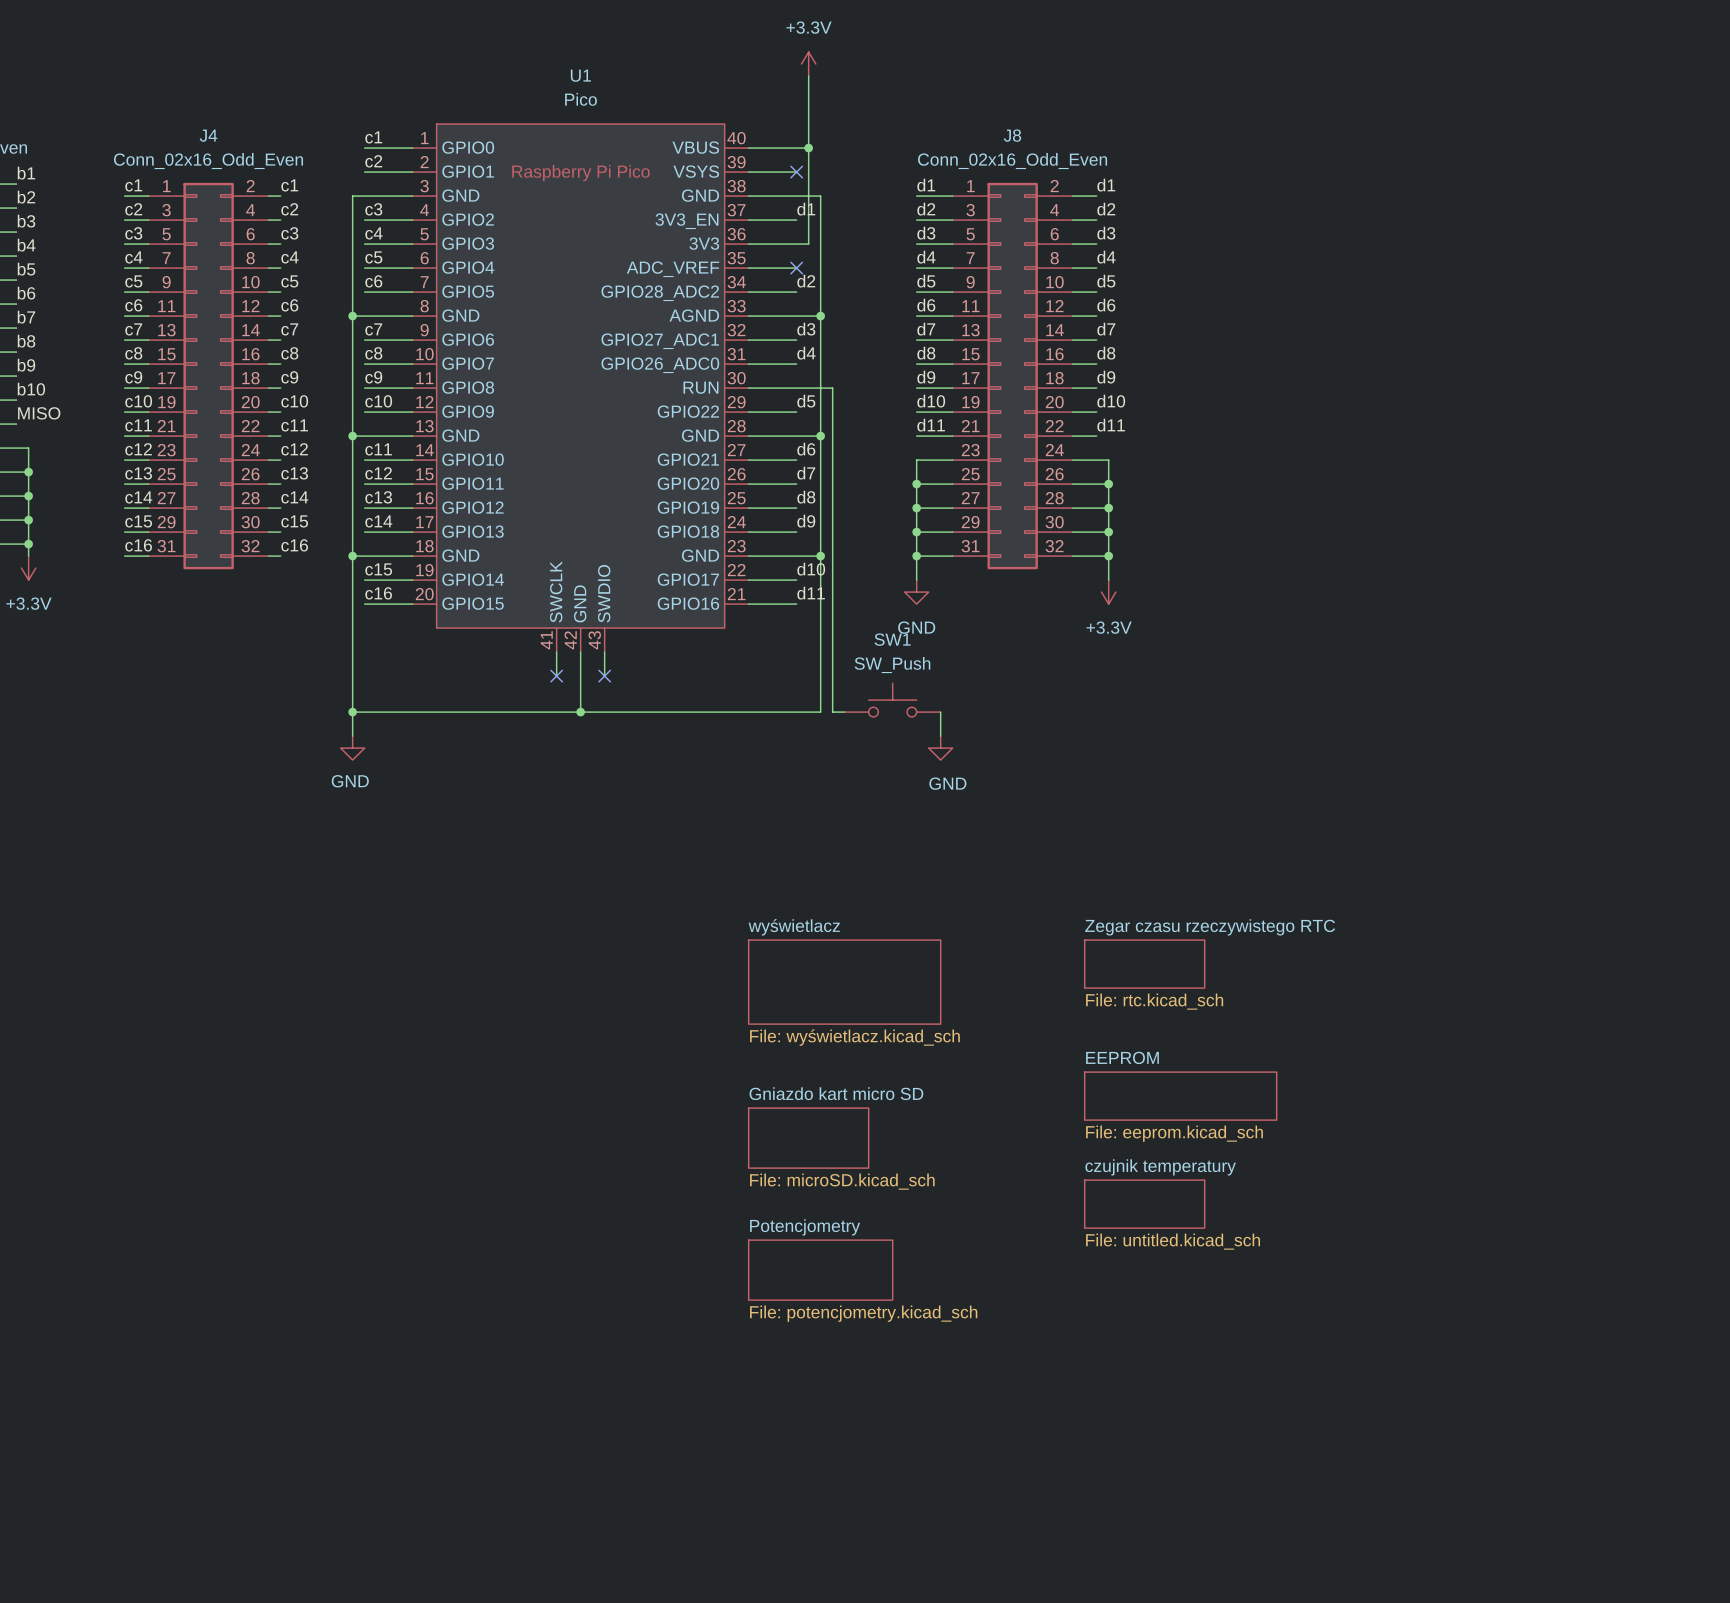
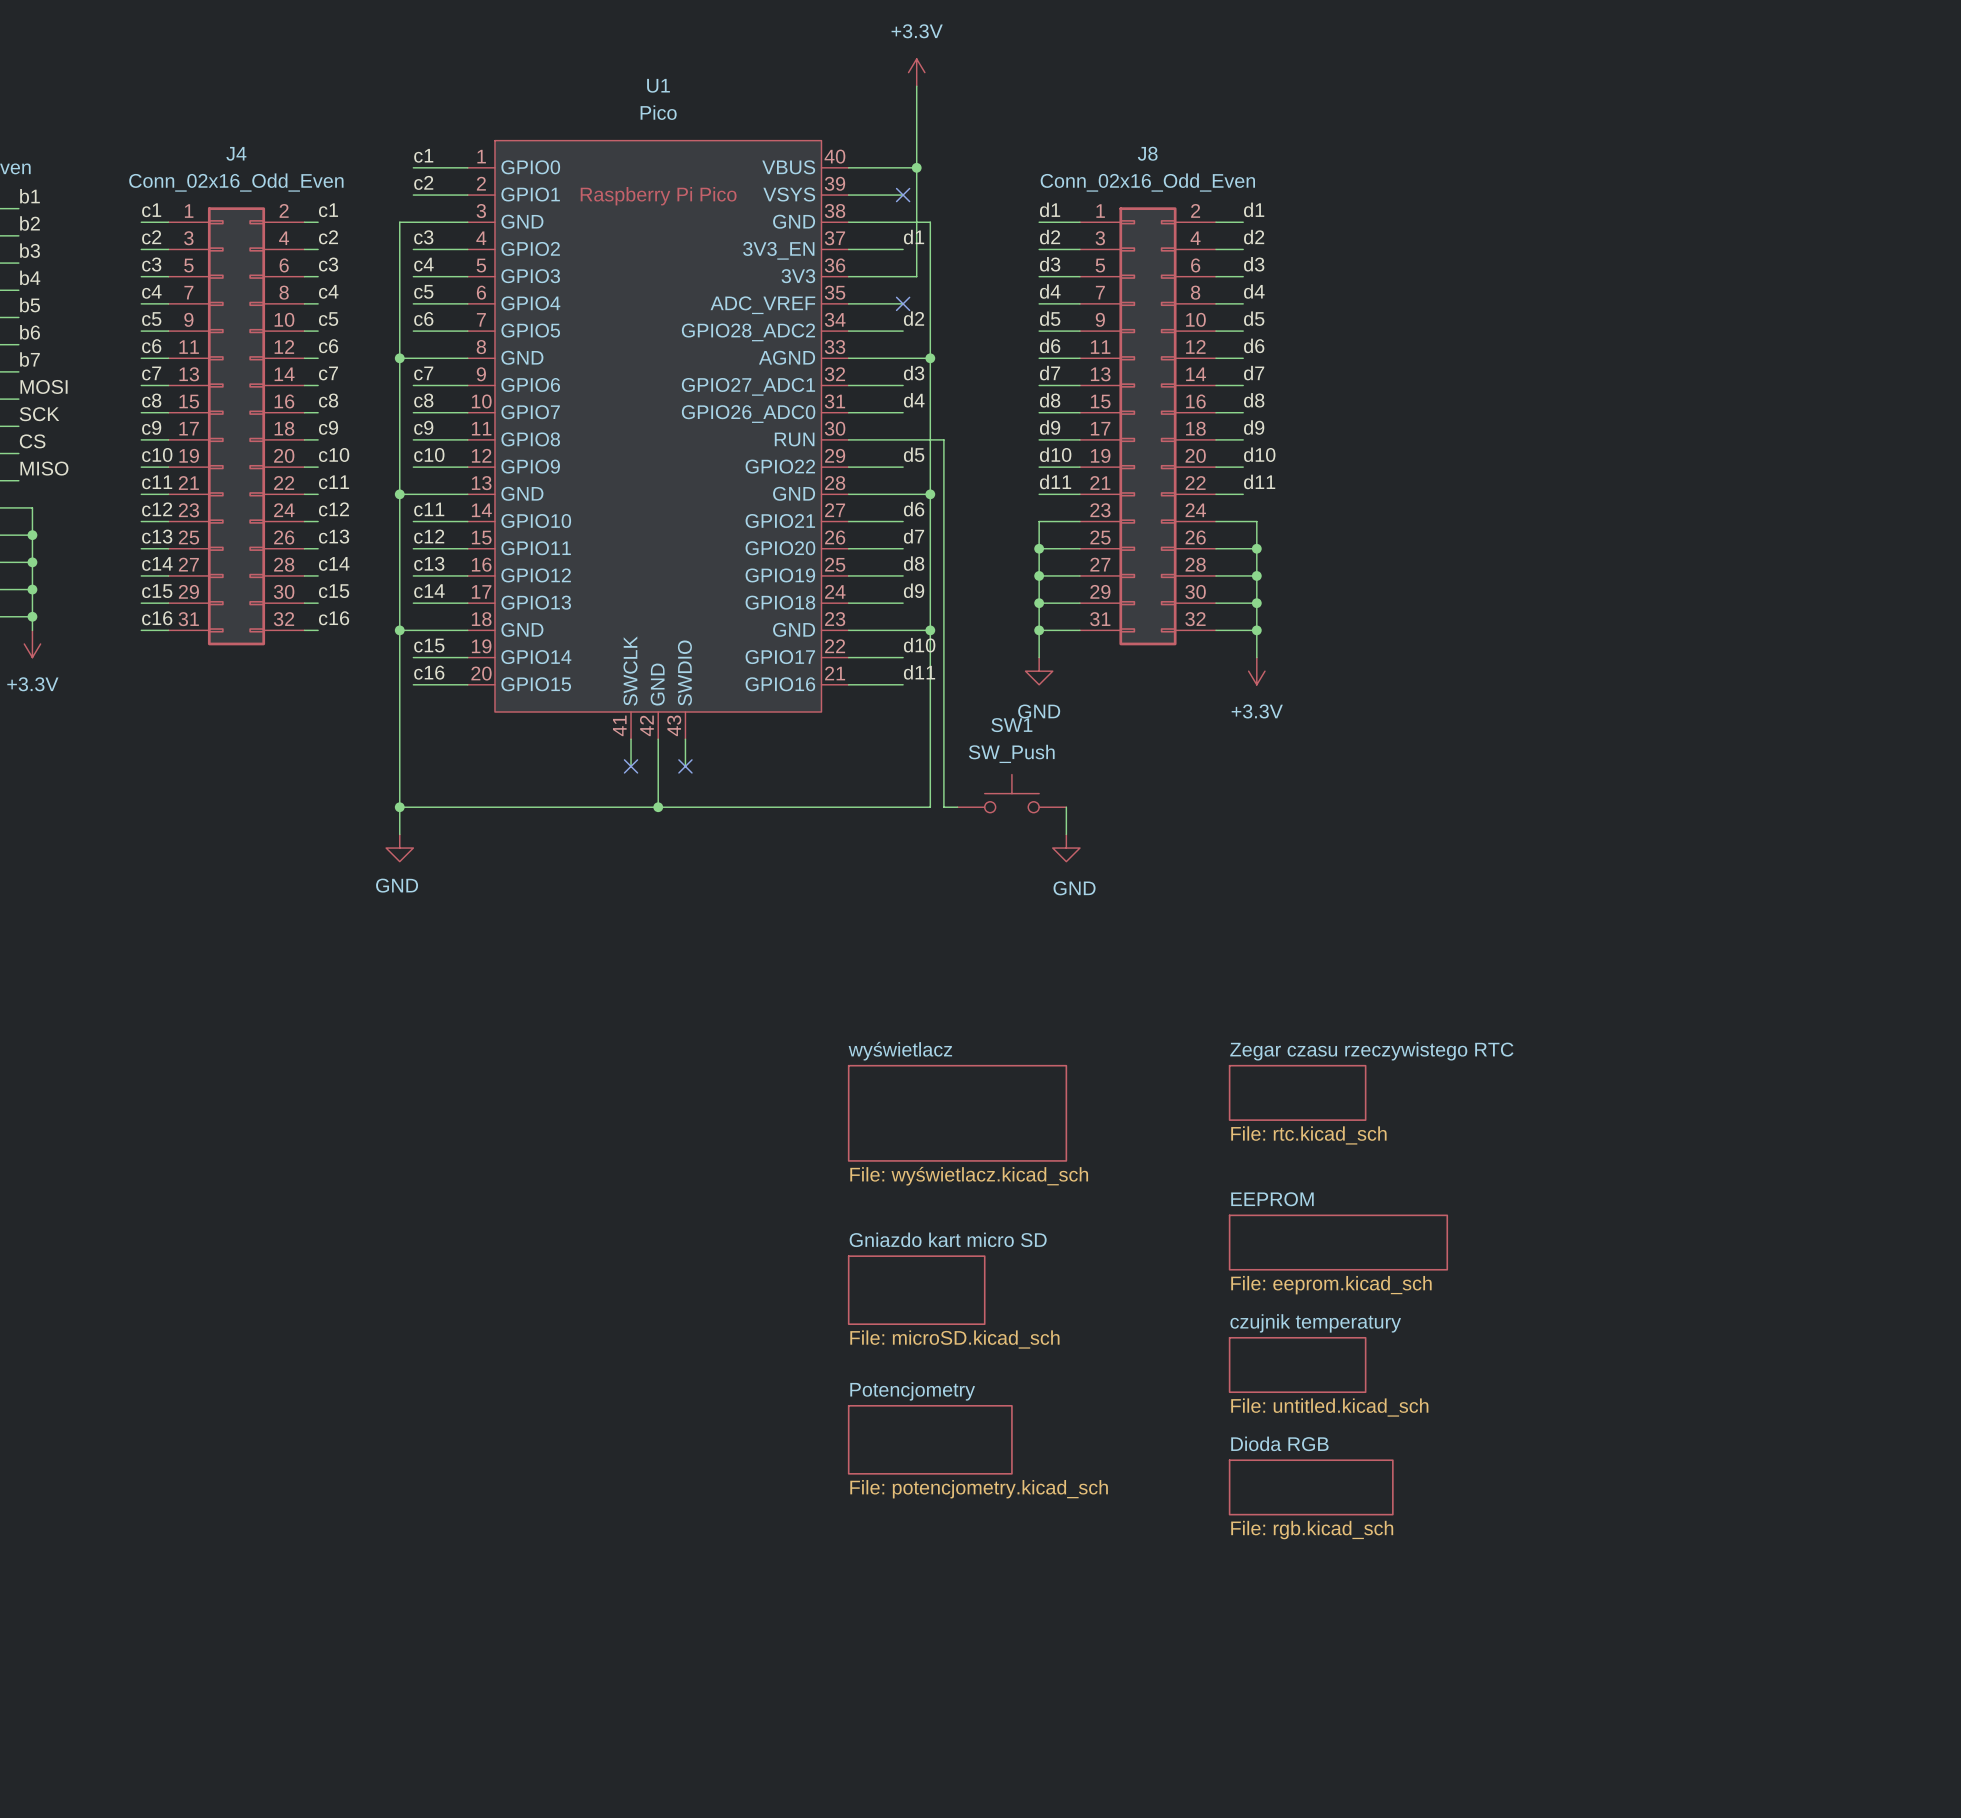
label: b8 (26, 341) -> MOSI (44, 386)
label: b9 (26, 365) -> SCK (39, 414)
label: b10 (31, 389) -> CS (32, 441)
sheet Dioda RGB: none -> File: rgb.kicad_sch (1311, 1487)

